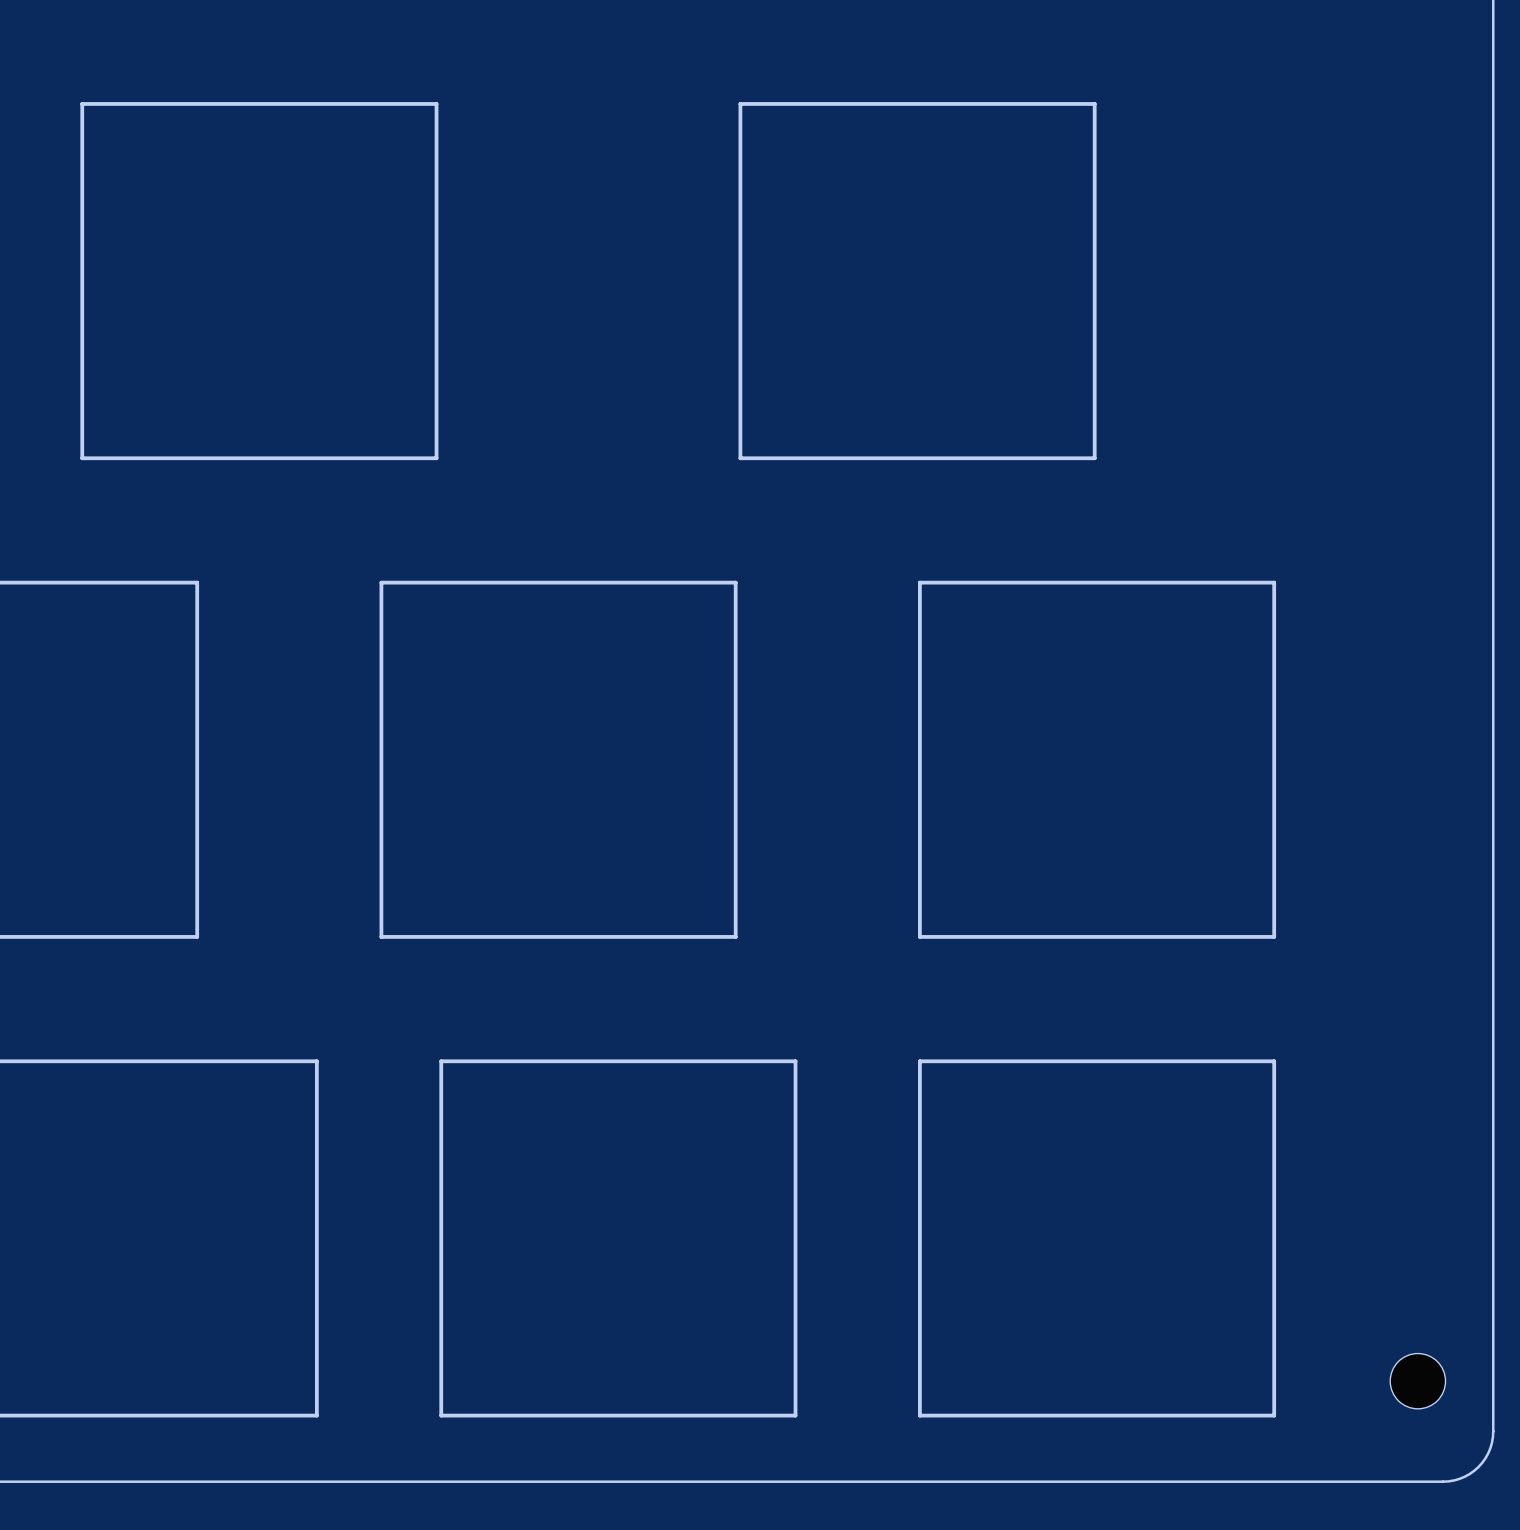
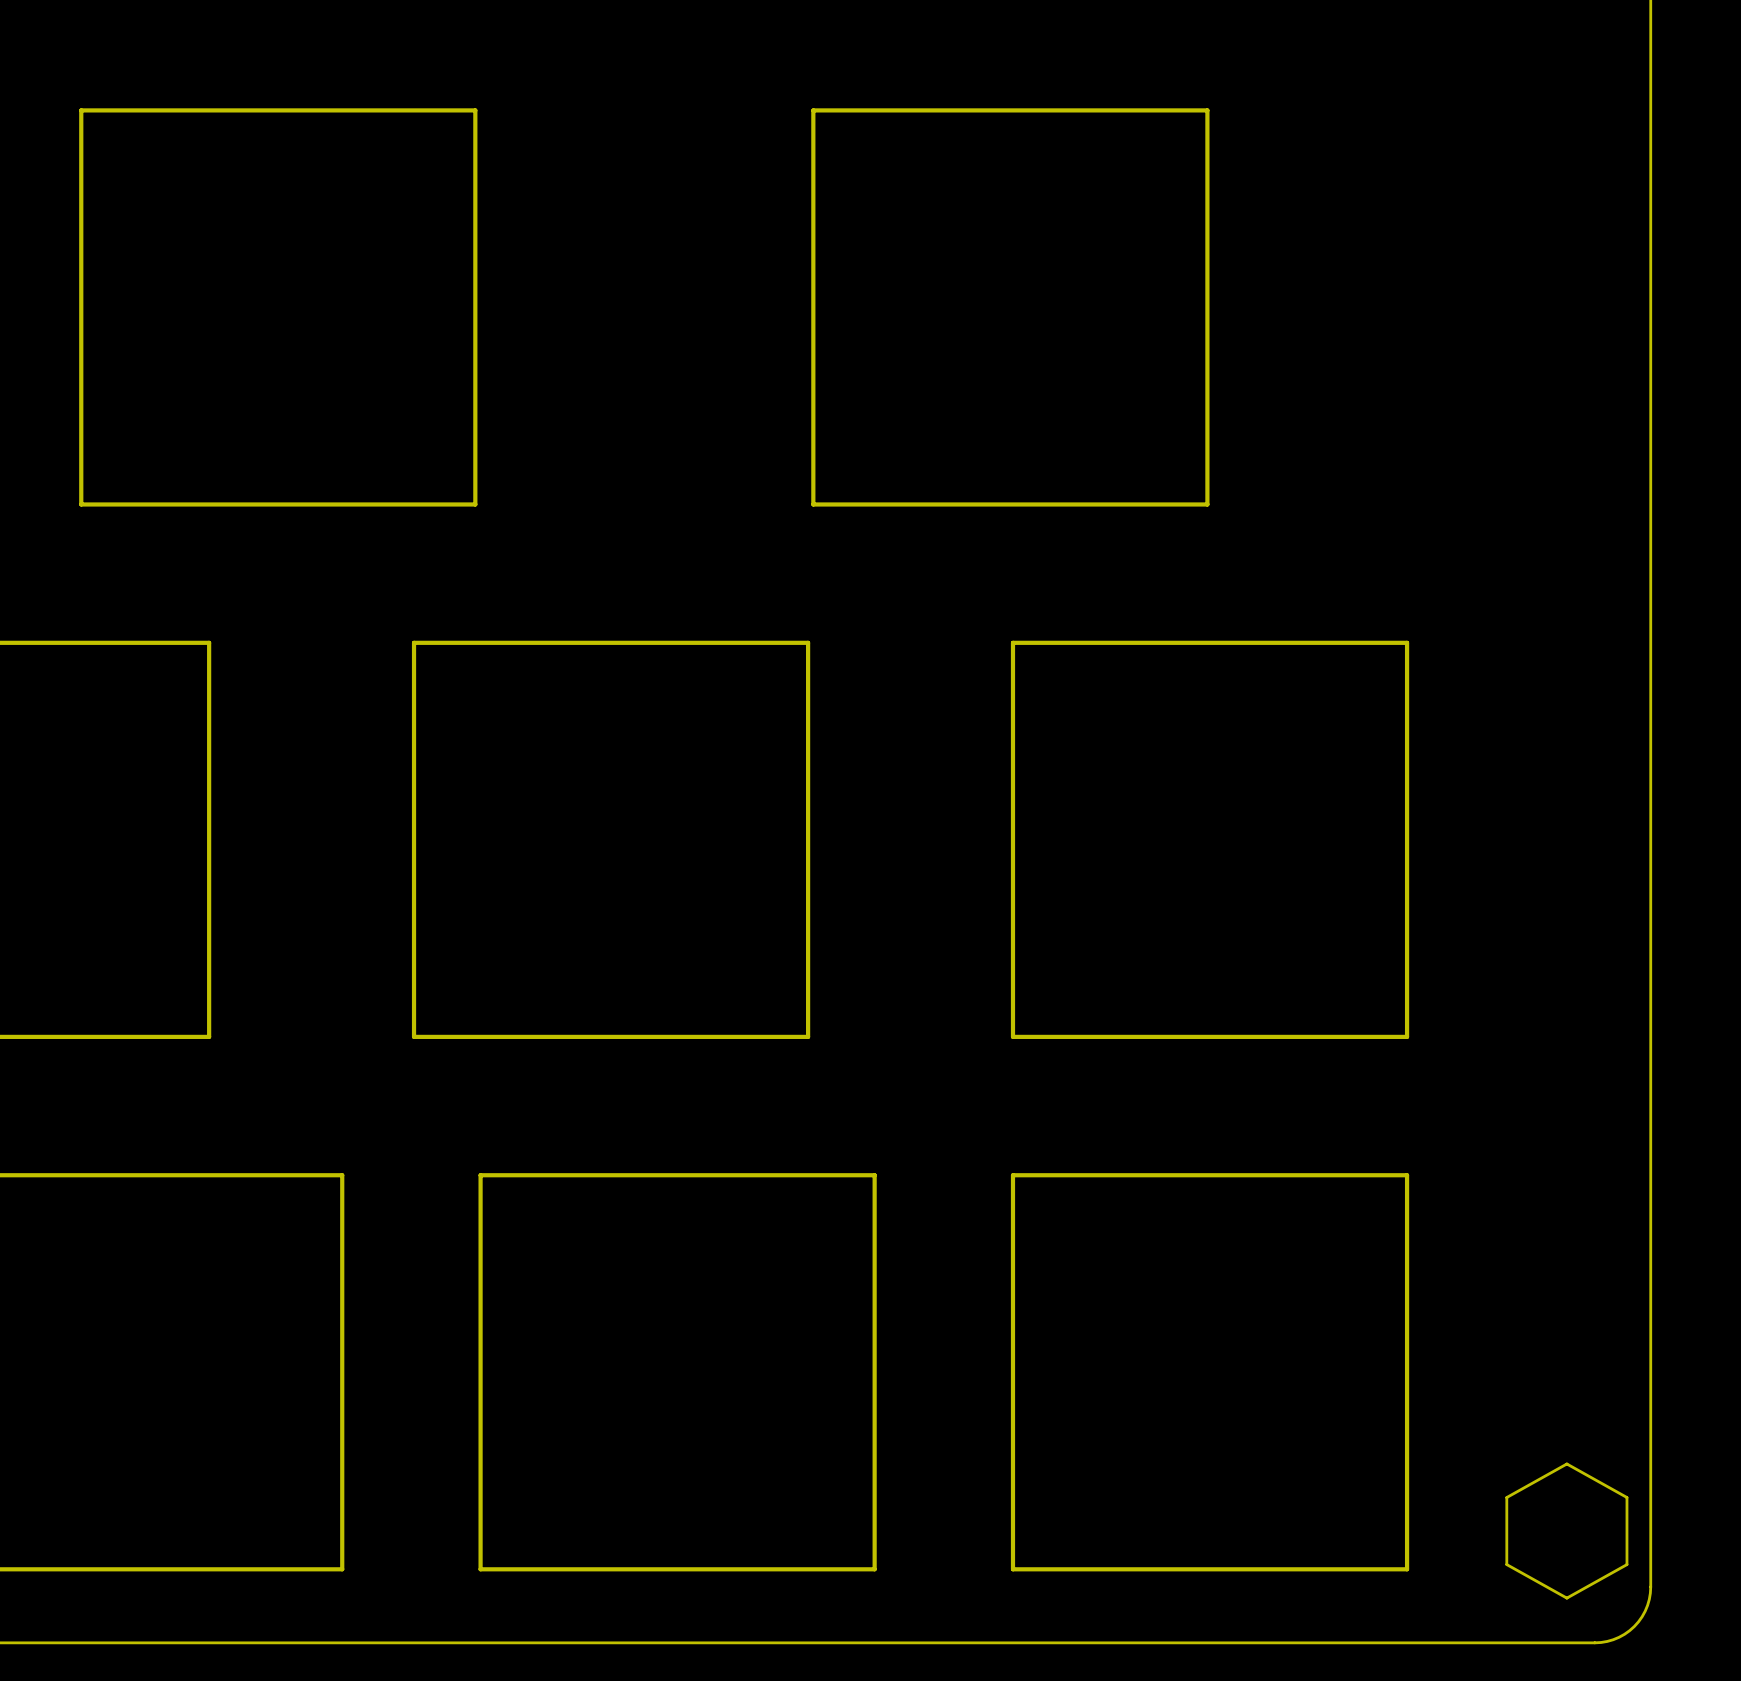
drawing: none -> [1505, 1462, 1629, 1600]
part: (1417, 1381) -> none

